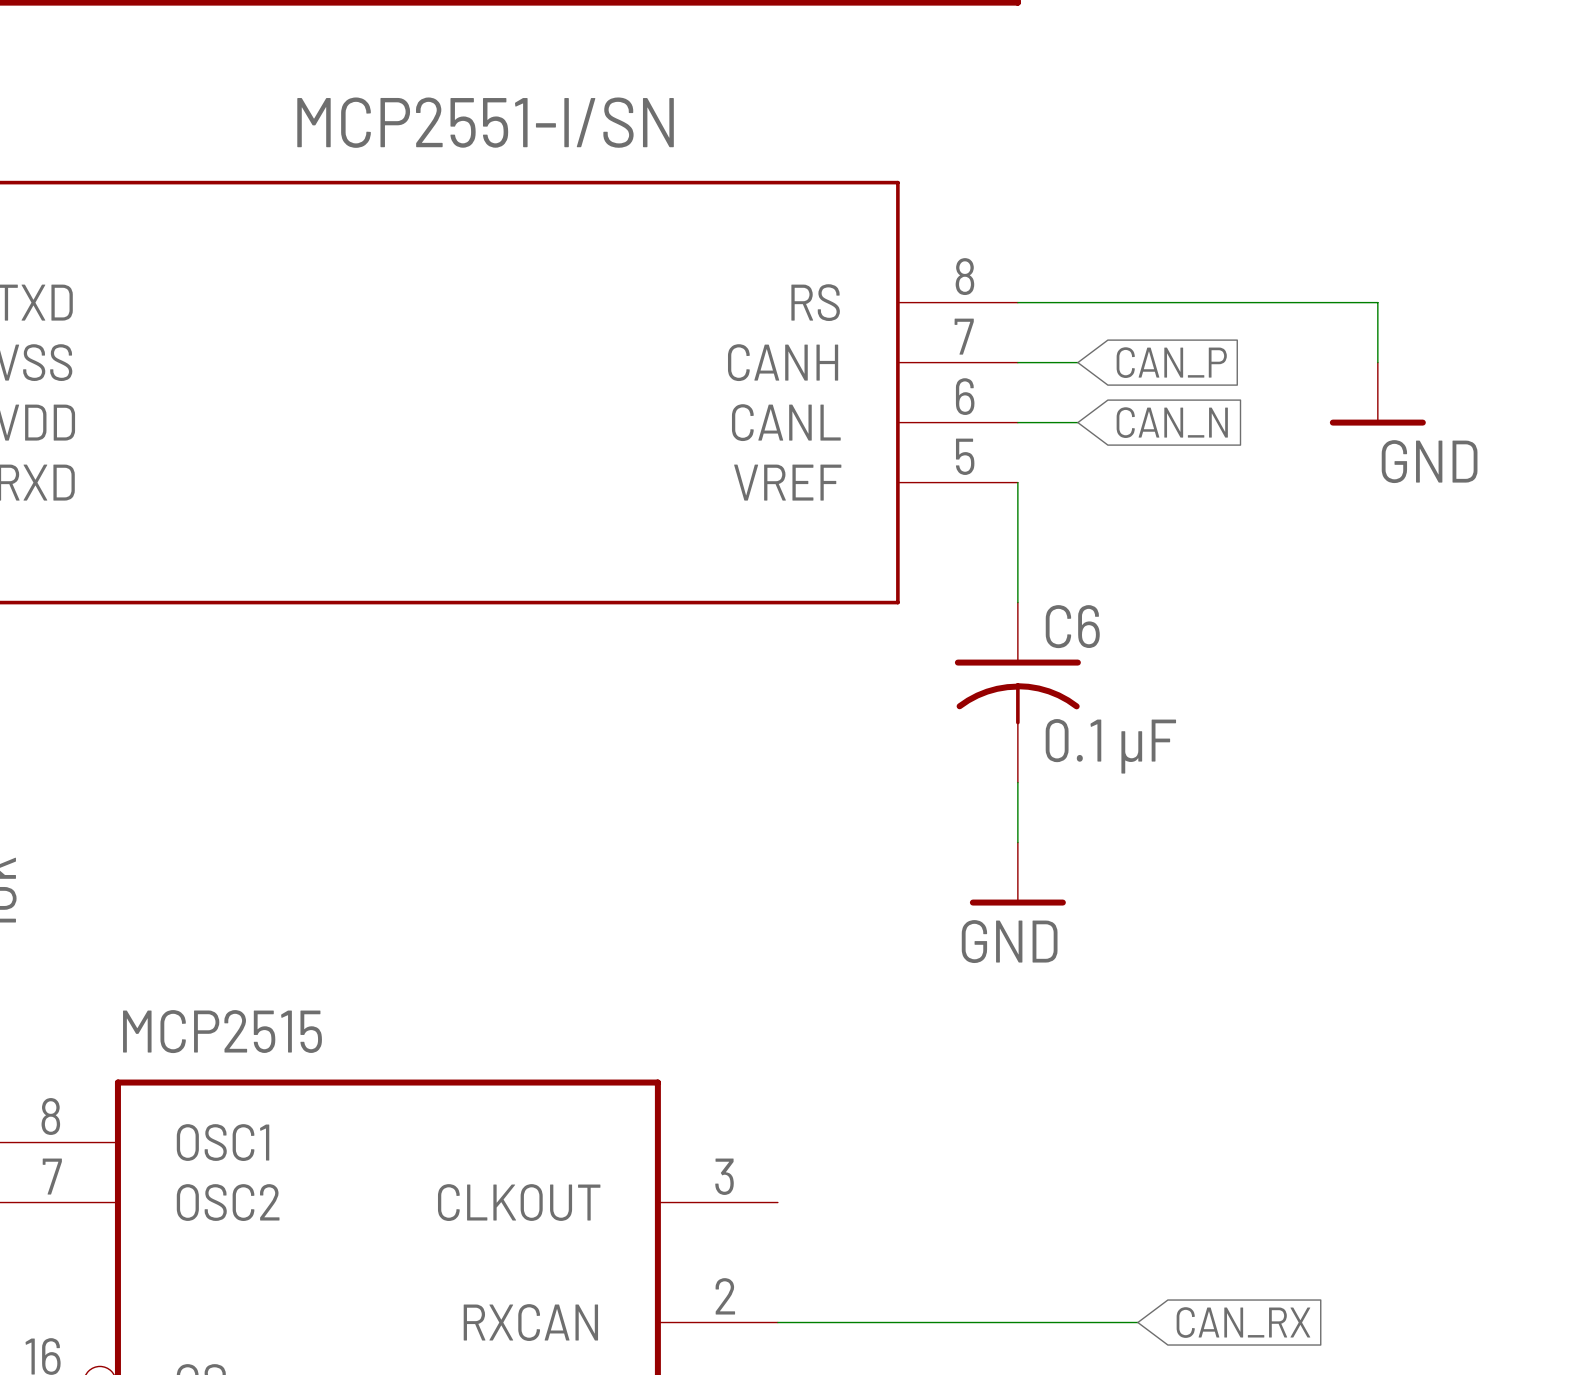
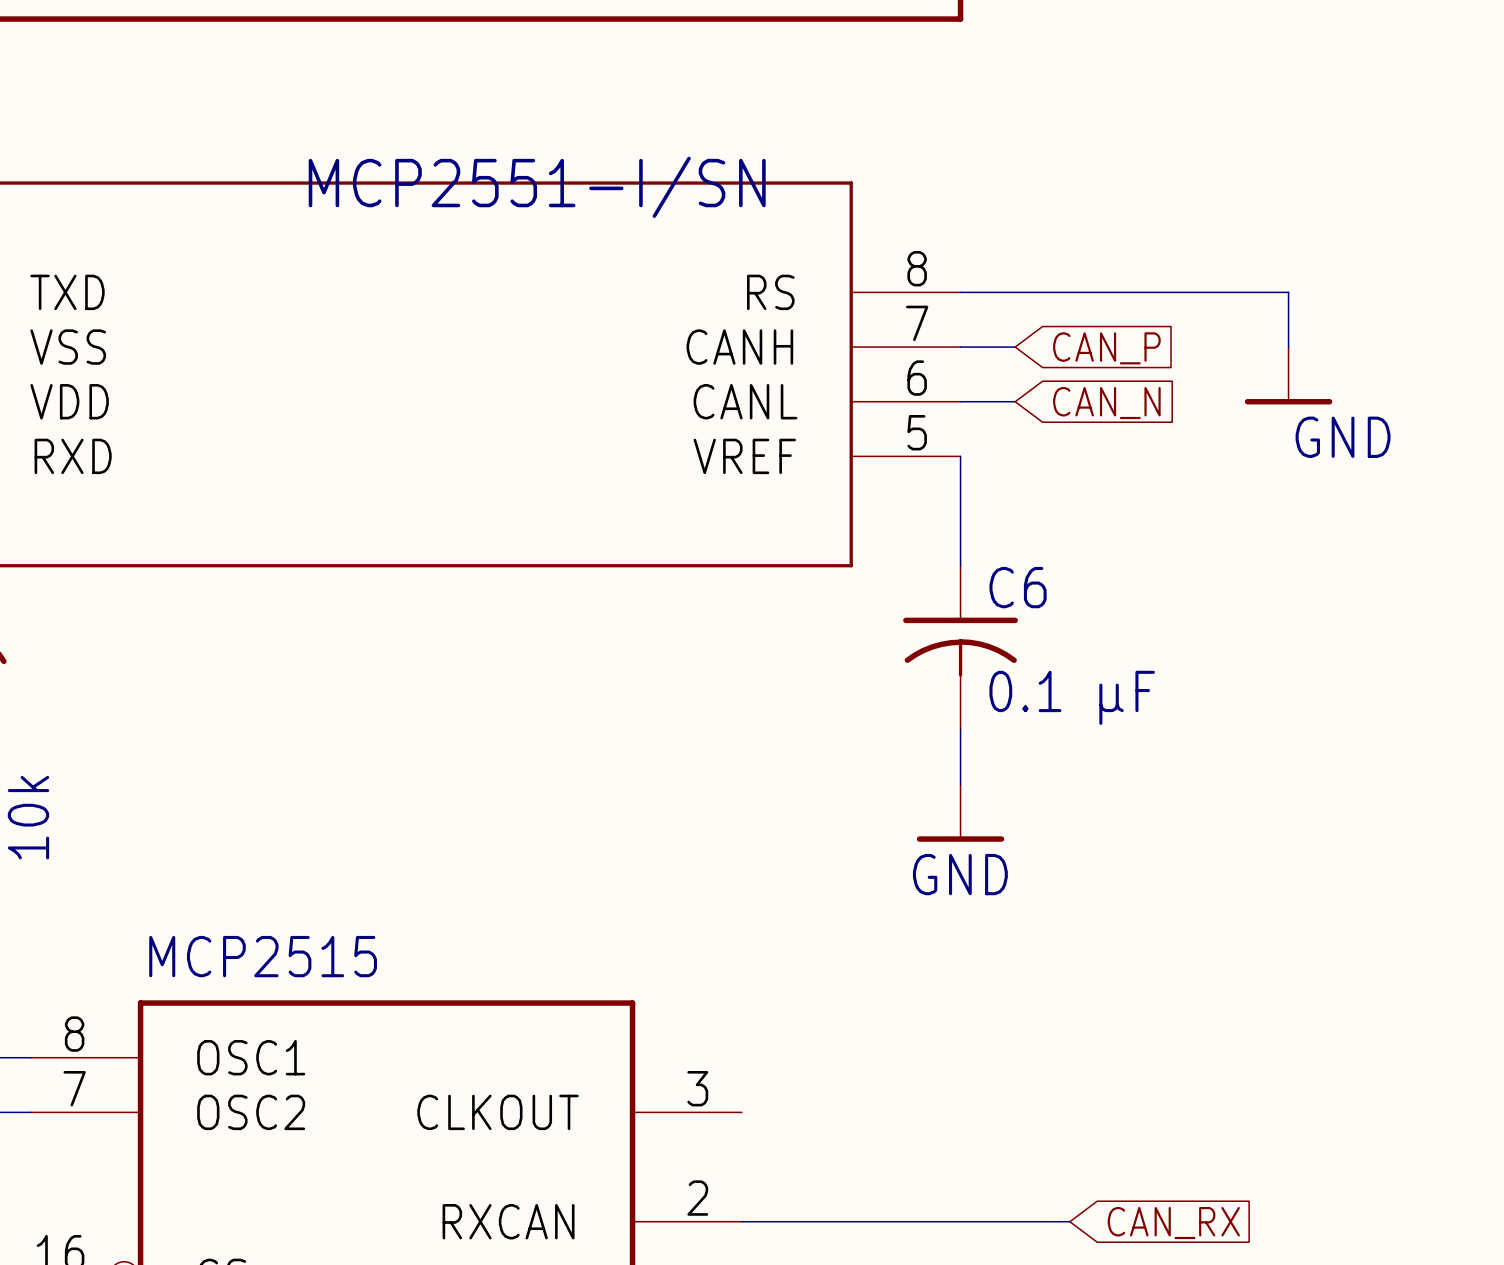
part value position: MCP2551-I/SN (485, 122) -> MCP2551-I/SN (537, 187)

